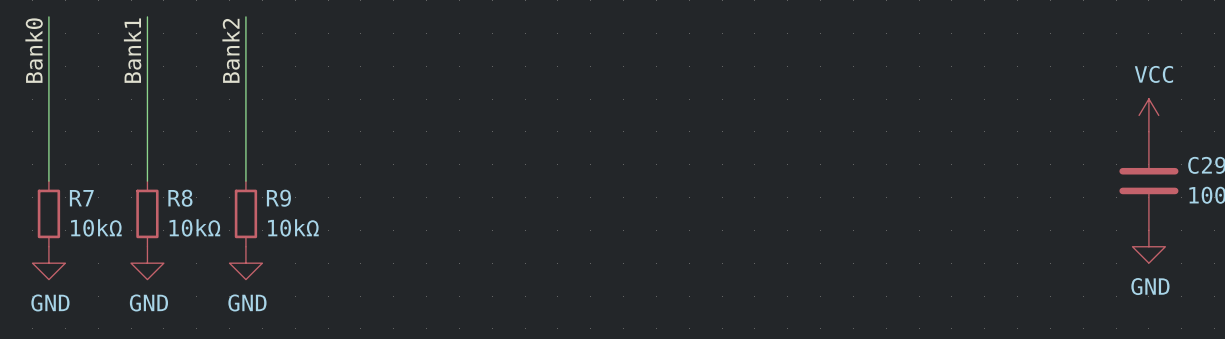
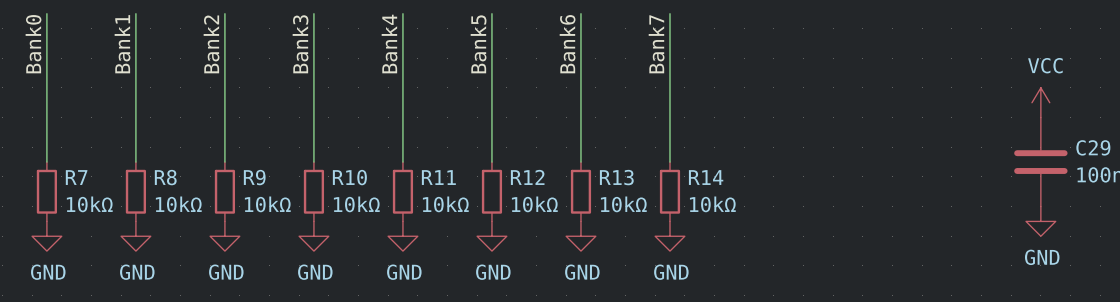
wire: none -> (313, 13) (313, 162)
wire: none -> (402, 13) (402, 162)
wire: none -> (491, 13) (491, 162)
wire: none -> (580, 13) (580, 162)
wire: none -> (669, 13) (669, 162)
label: none -> Bank3 (300, 44)
label: none -> Bank4 (389, 44)
label: none -> Bank5 (478, 44)
label: none -> Bank6 (567, 44)
label: none -> Bank7 (656, 44)
R10: none -> 10kΩ (313, 191)
R11: none -> 10kΩ (402, 191)
R12: none -> 10kΩ (491, 191)
R13: none -> 10kΩ (580, 191)
R14: none -> 10kΩ (669, 191)
power symbol: none -> GND (313, 236)
power symbol: none -> GND (402, 236)
power symbol: none -> GND (491, 236)
power symbol: none -> GND (580, 236)
power symbol: none -> GND (669, 236)

